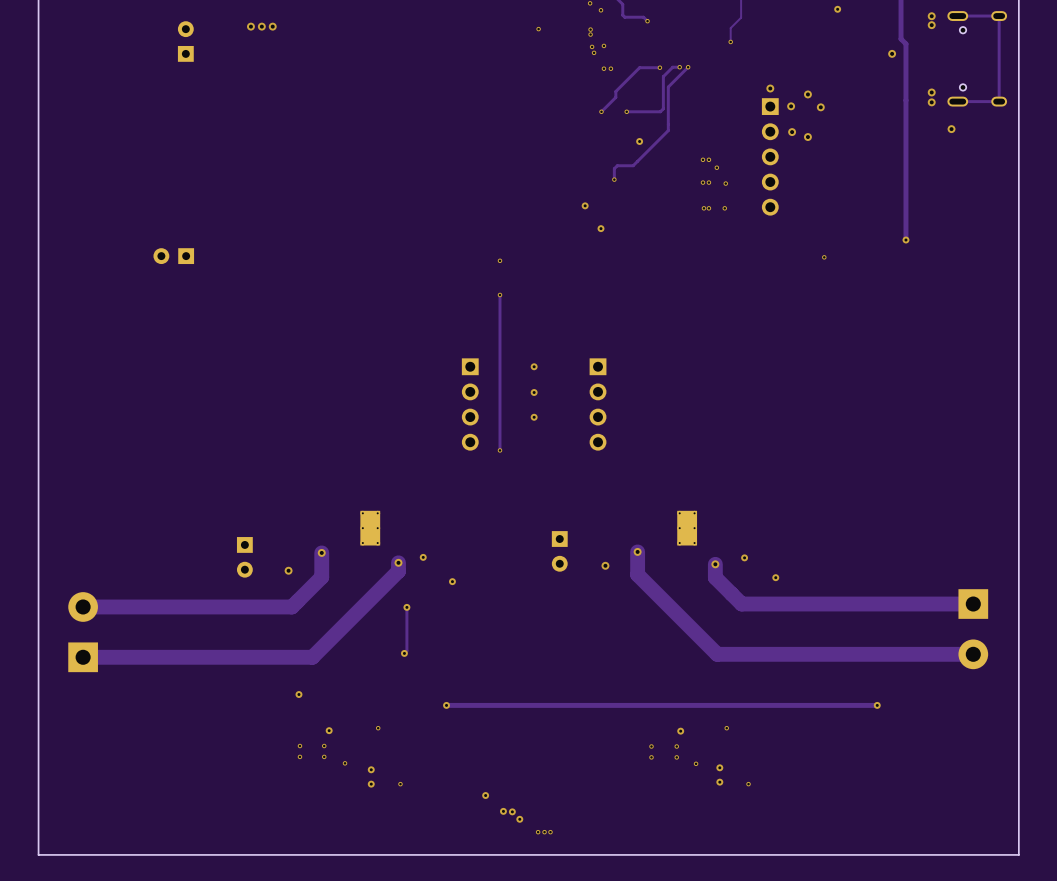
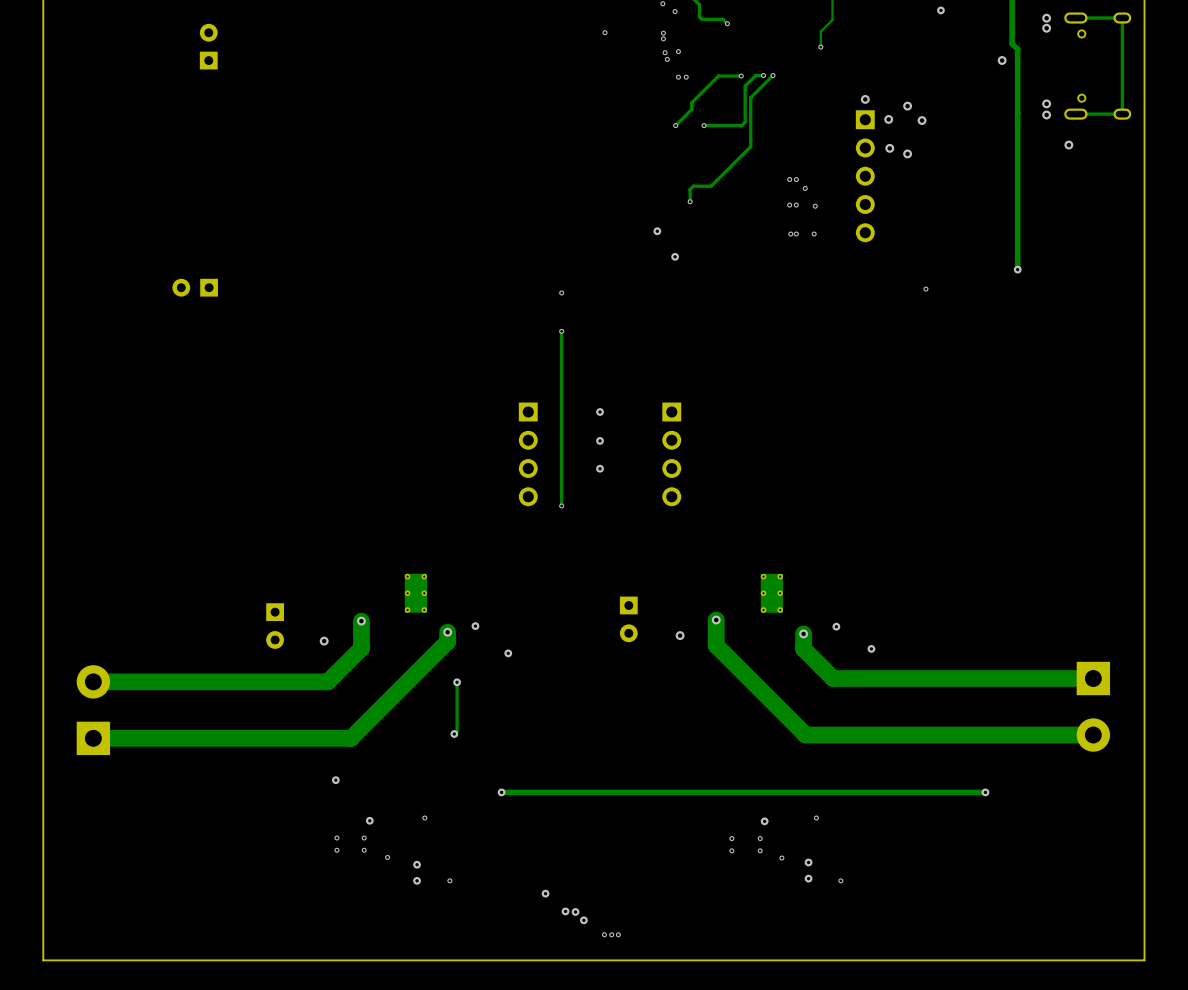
via: (250, 26) -> none
via: (261, 26) -> none
via: (272, 26) -> none
via: (639, 141) -> none

